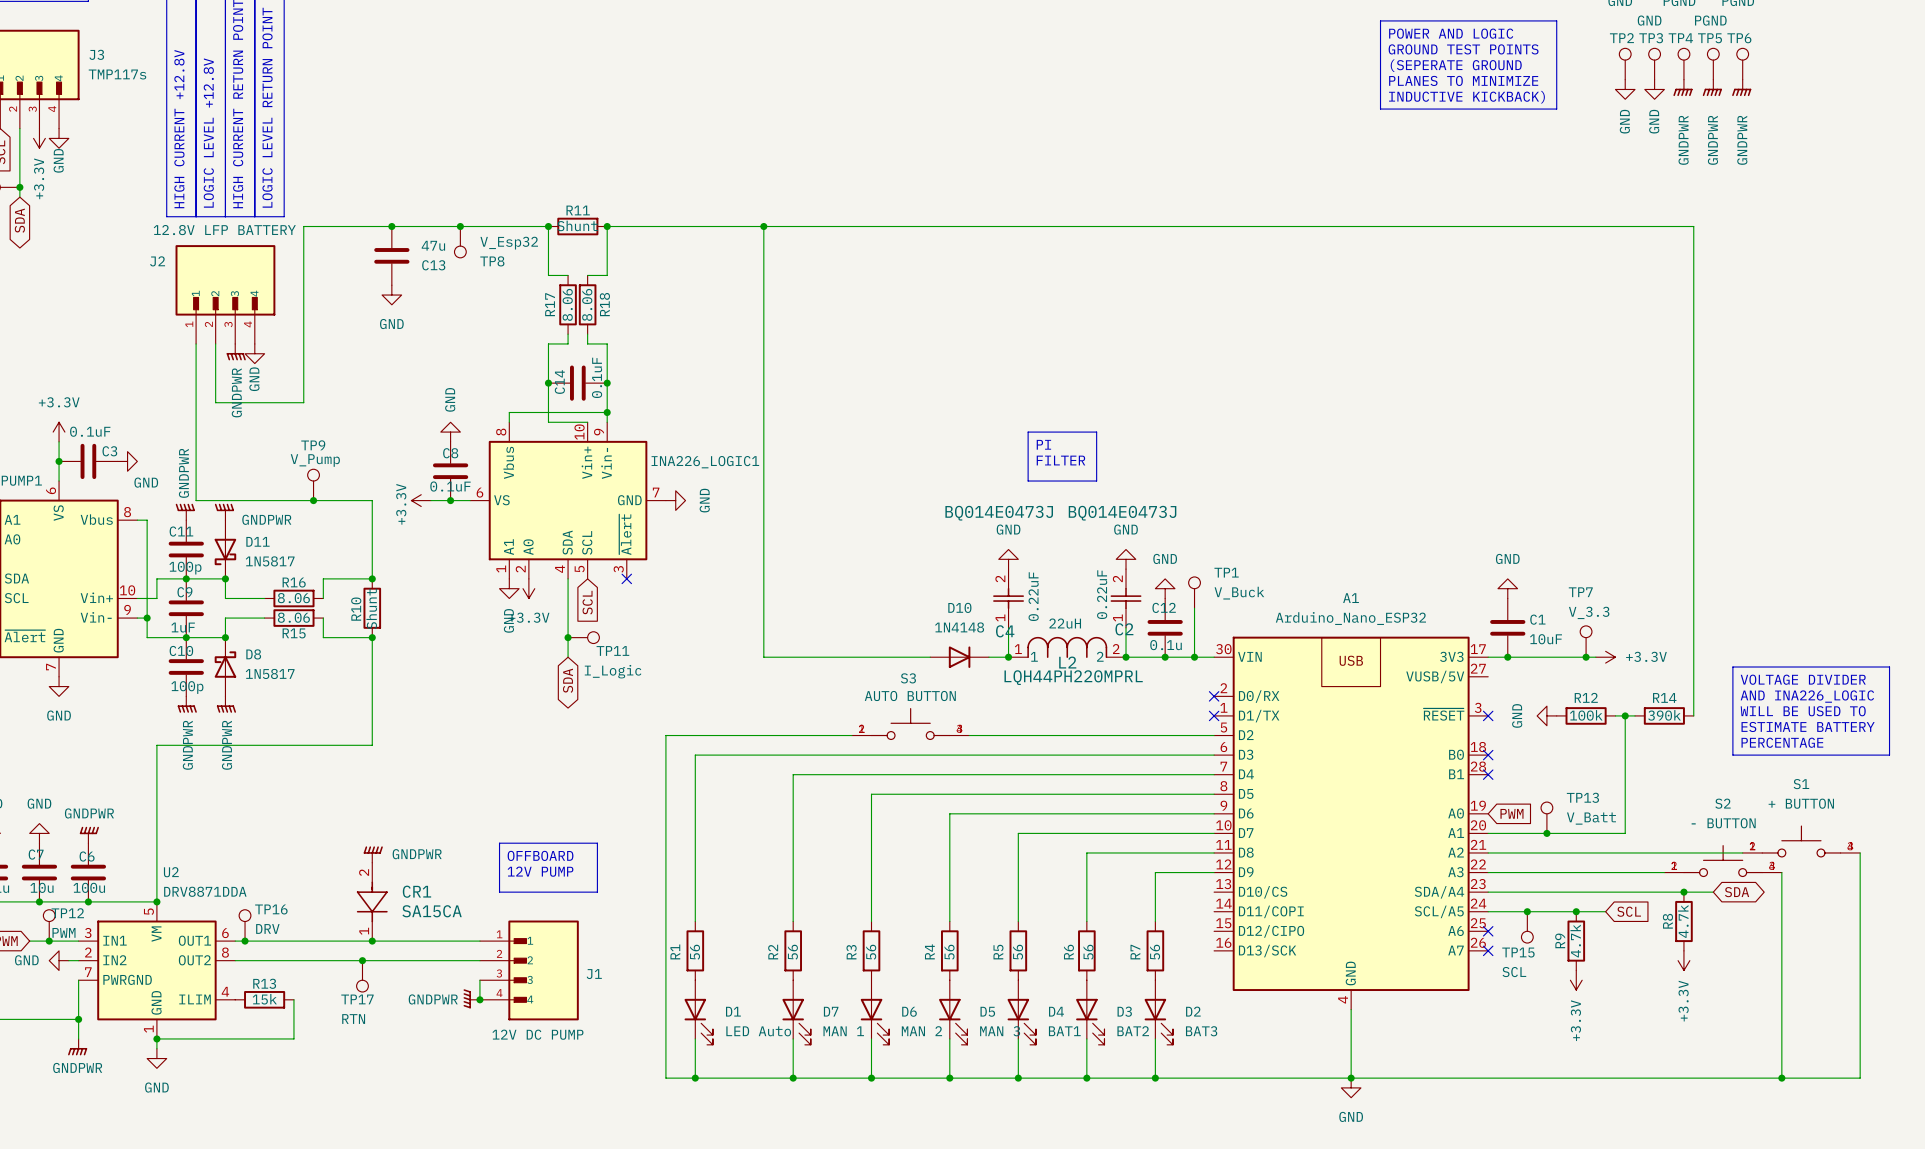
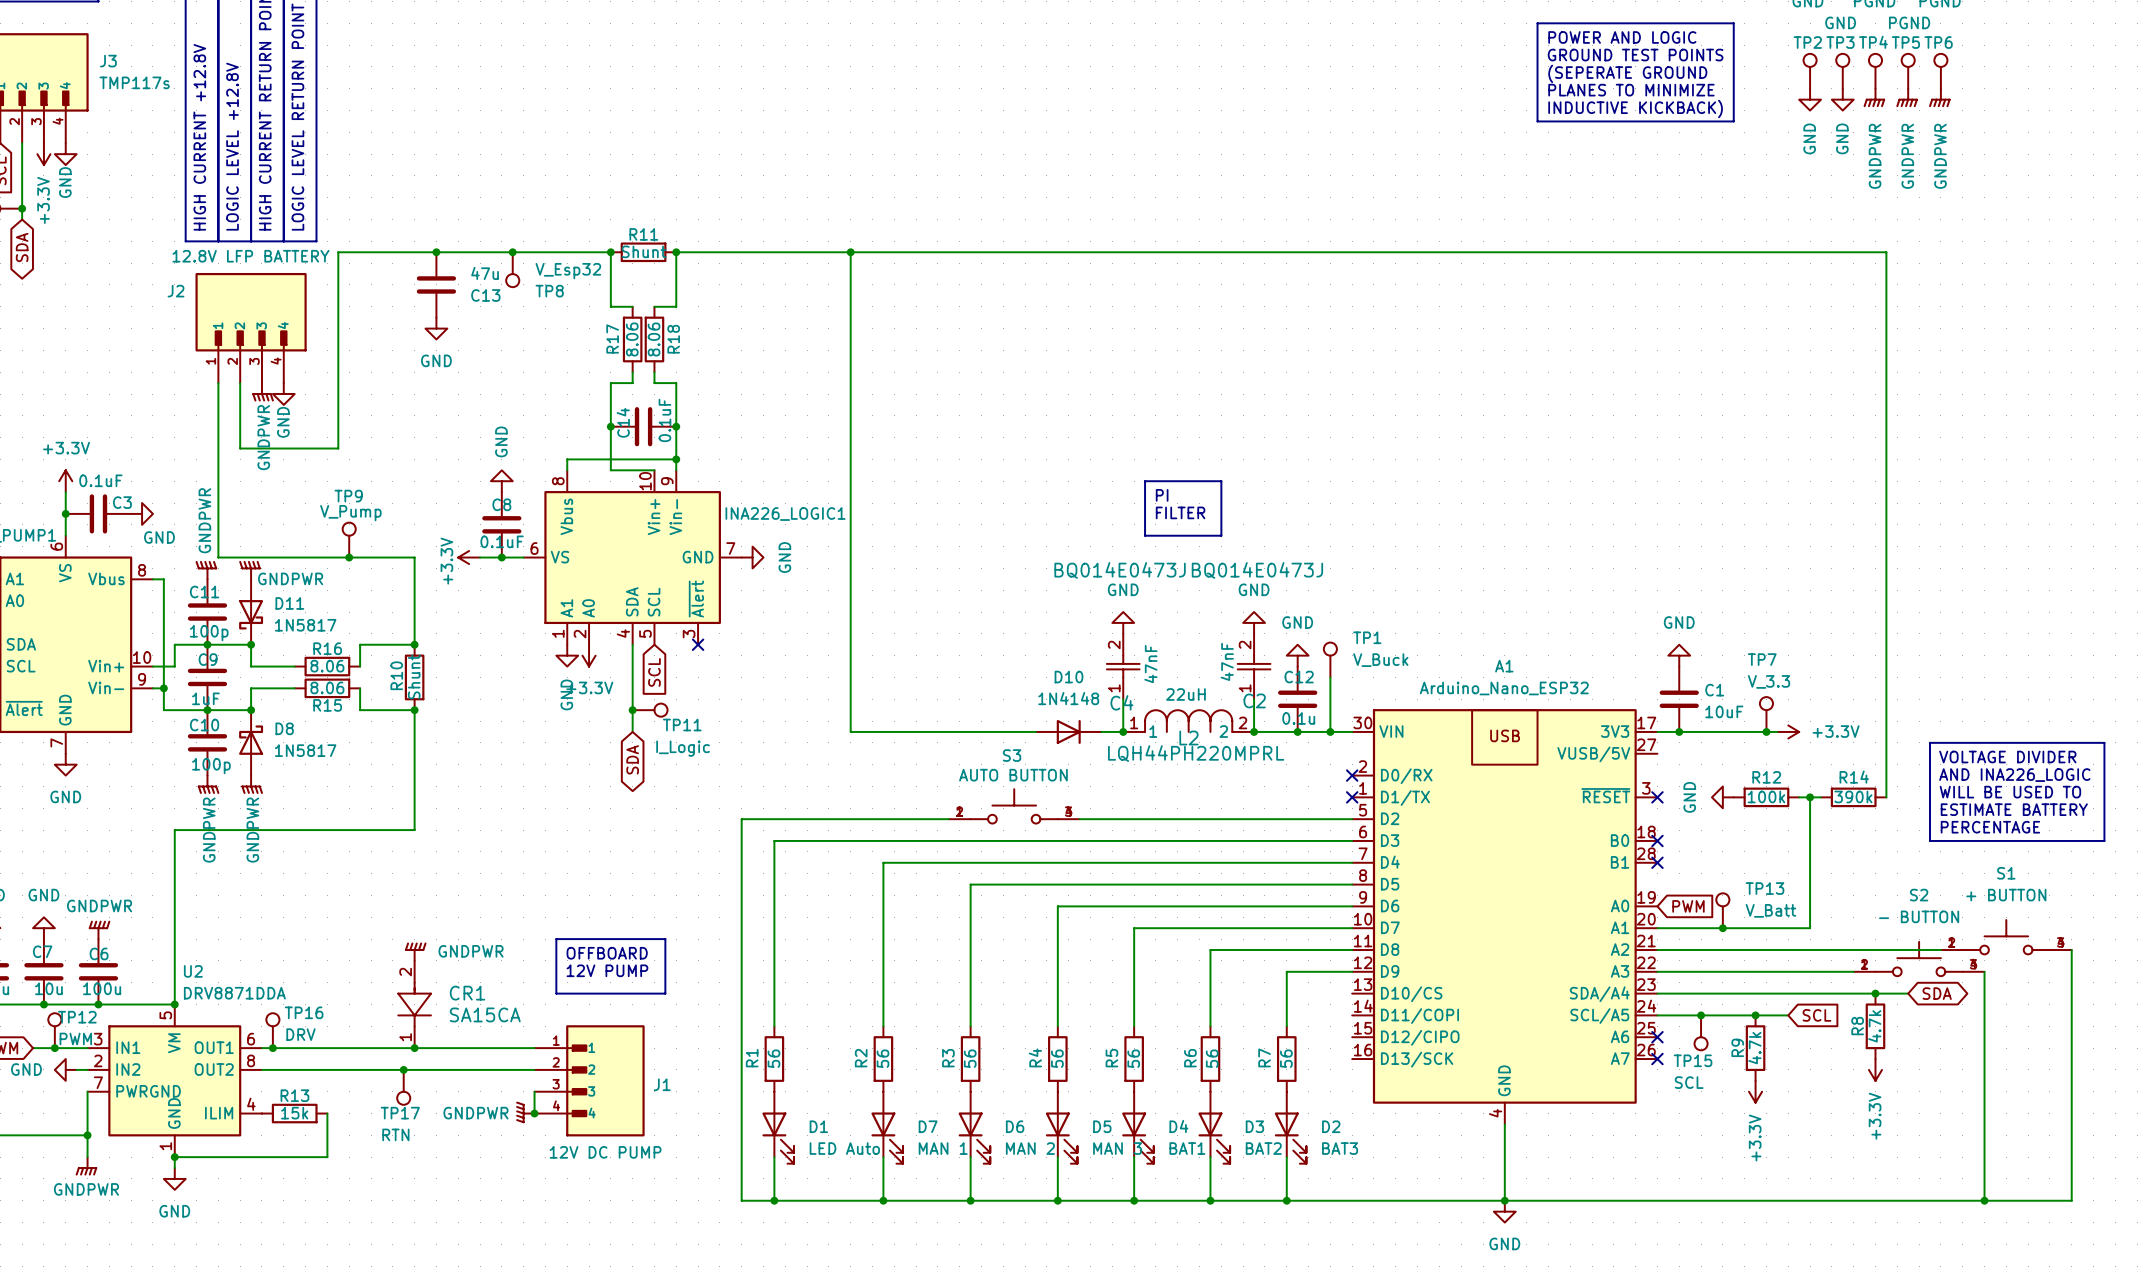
C2 text: 0.22uF (1102, 594) -> 47nF (1227, 661)
C4 text: 0.22uF (1033, 596) -> 47nF (1150, 664)

